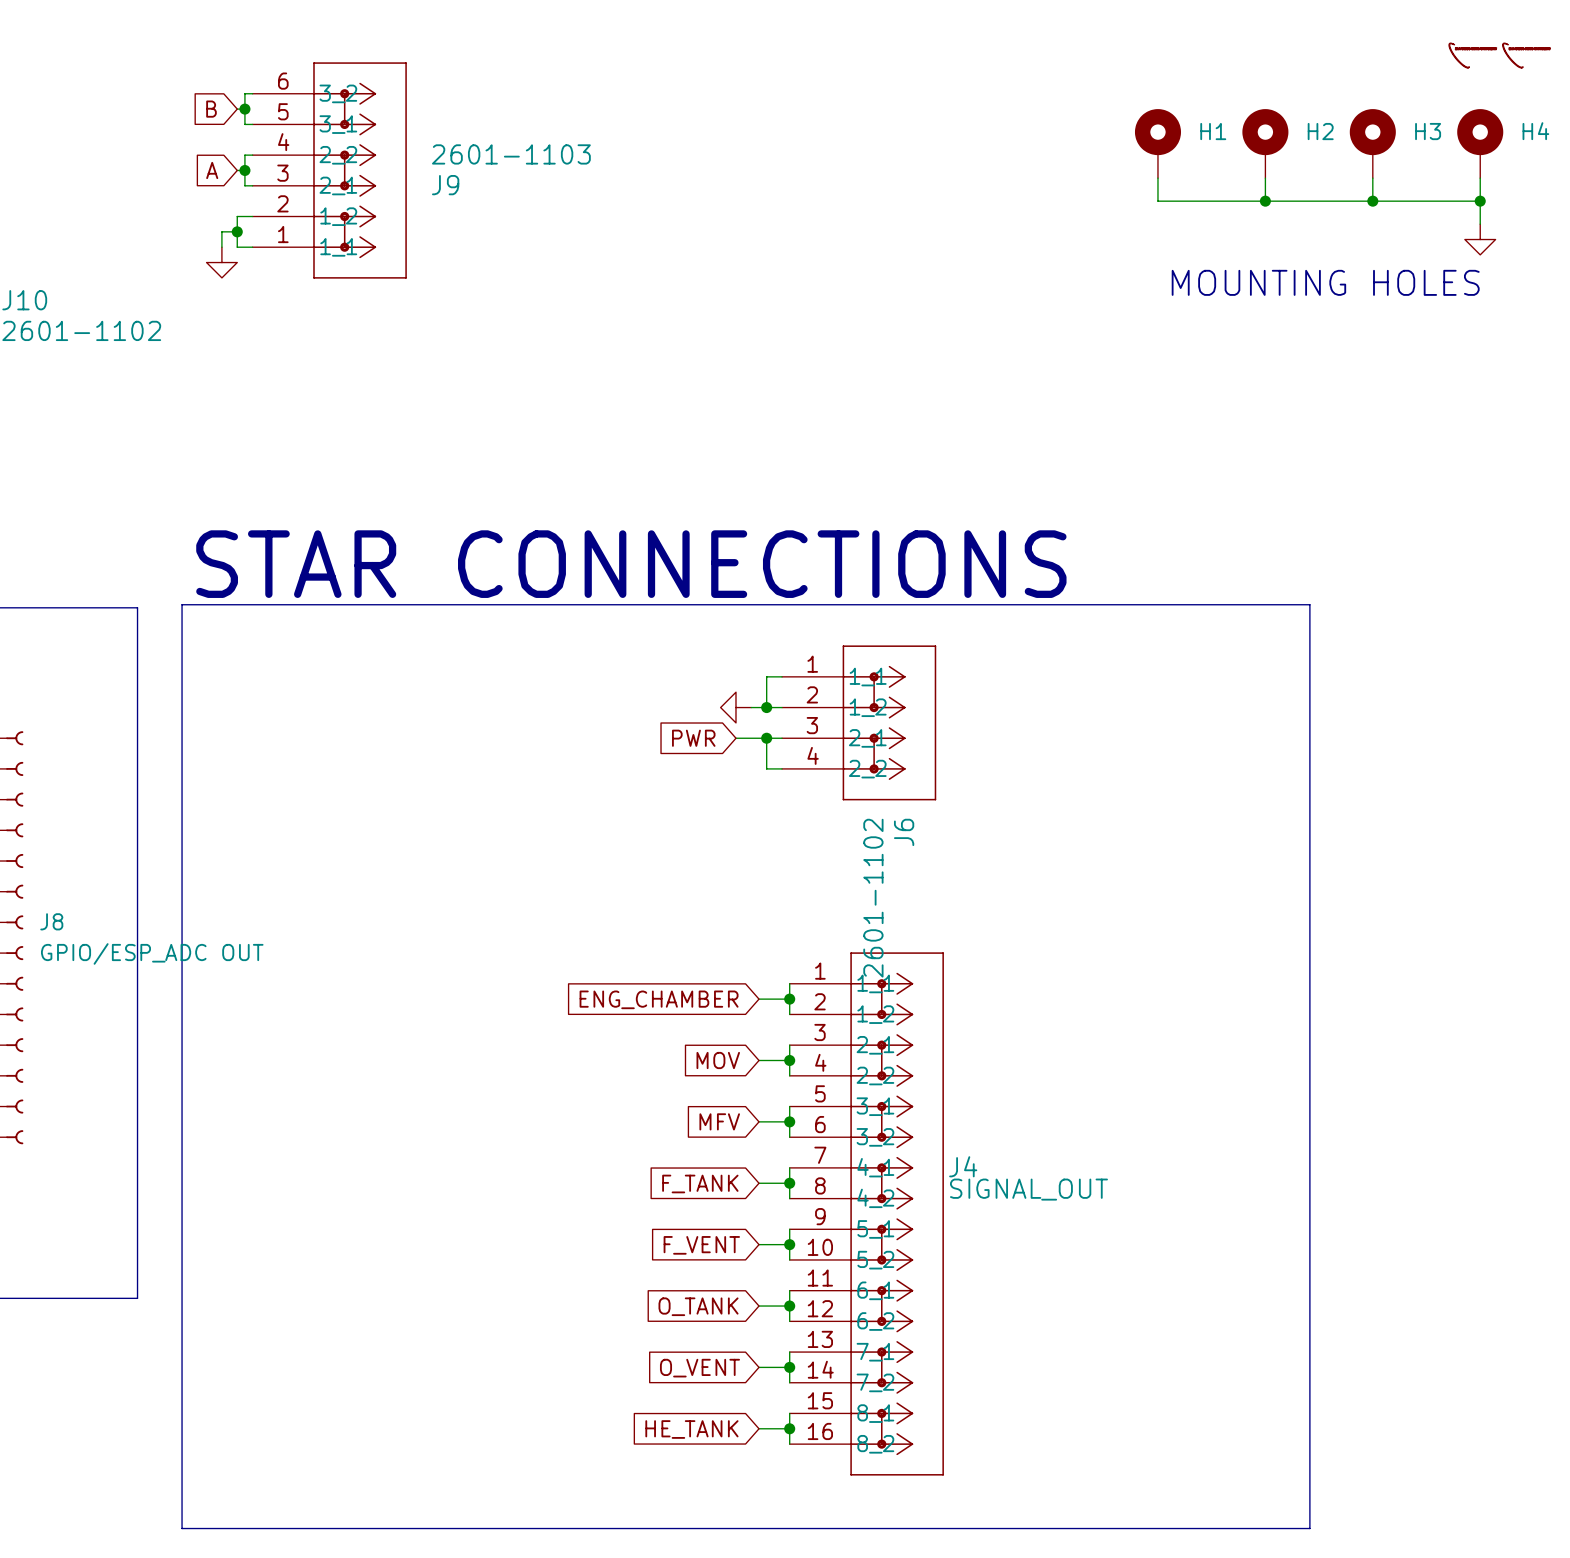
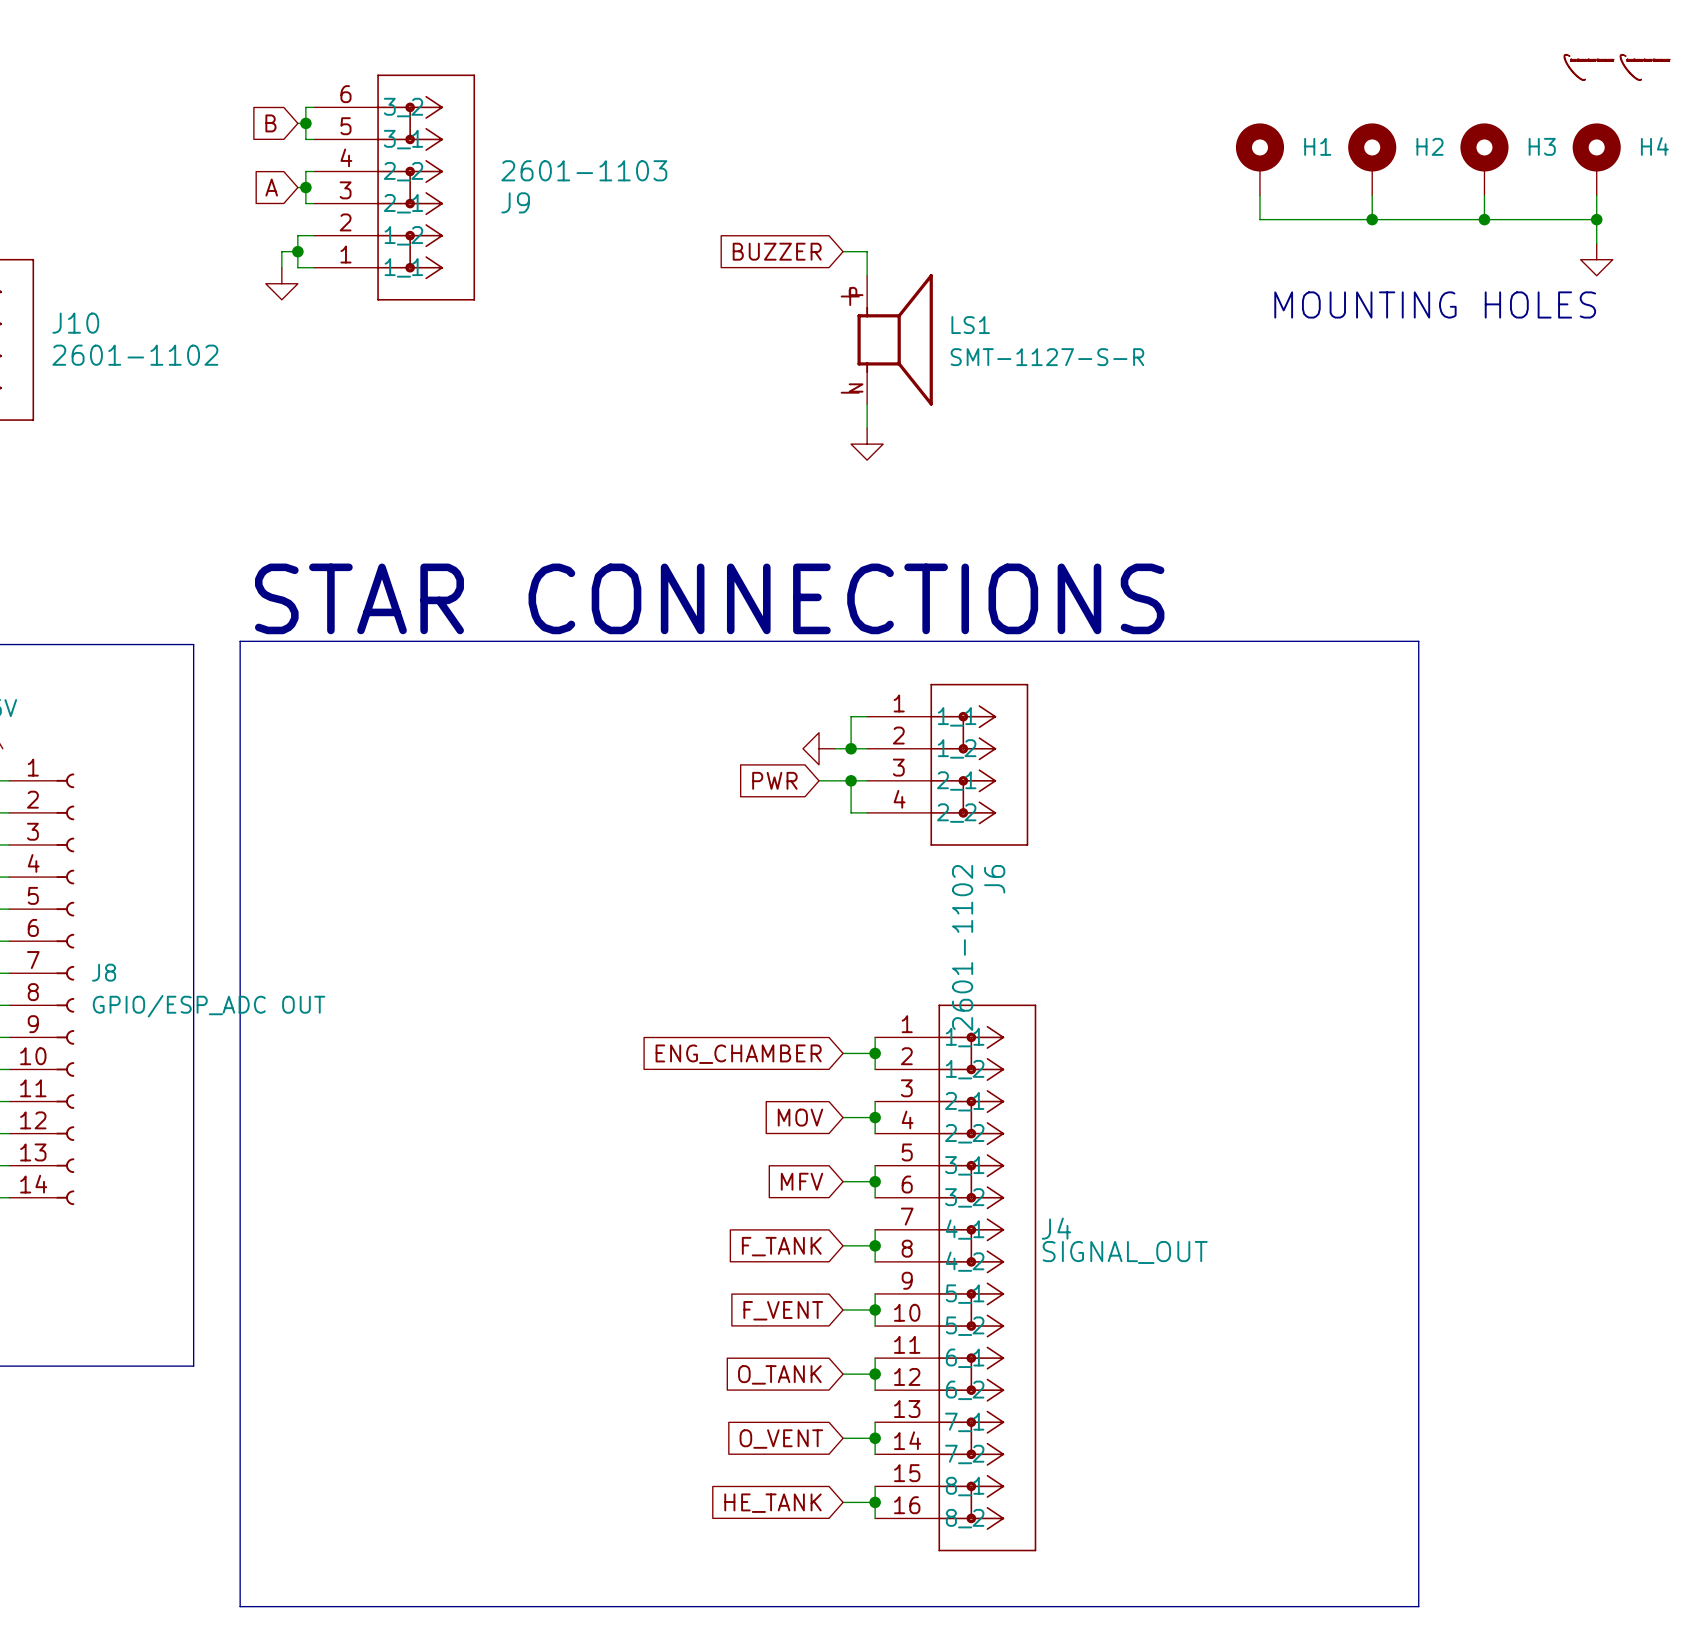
global label: none -> BUZZER (777, 251)
wire: none -> (843, 251) (867, 251) (867, 275)
LS1: none -> SMT-1127-S-R (895, 339)
wire: none -> (867, 404) (867, 428)
power symbol: none -> (867, 444)

